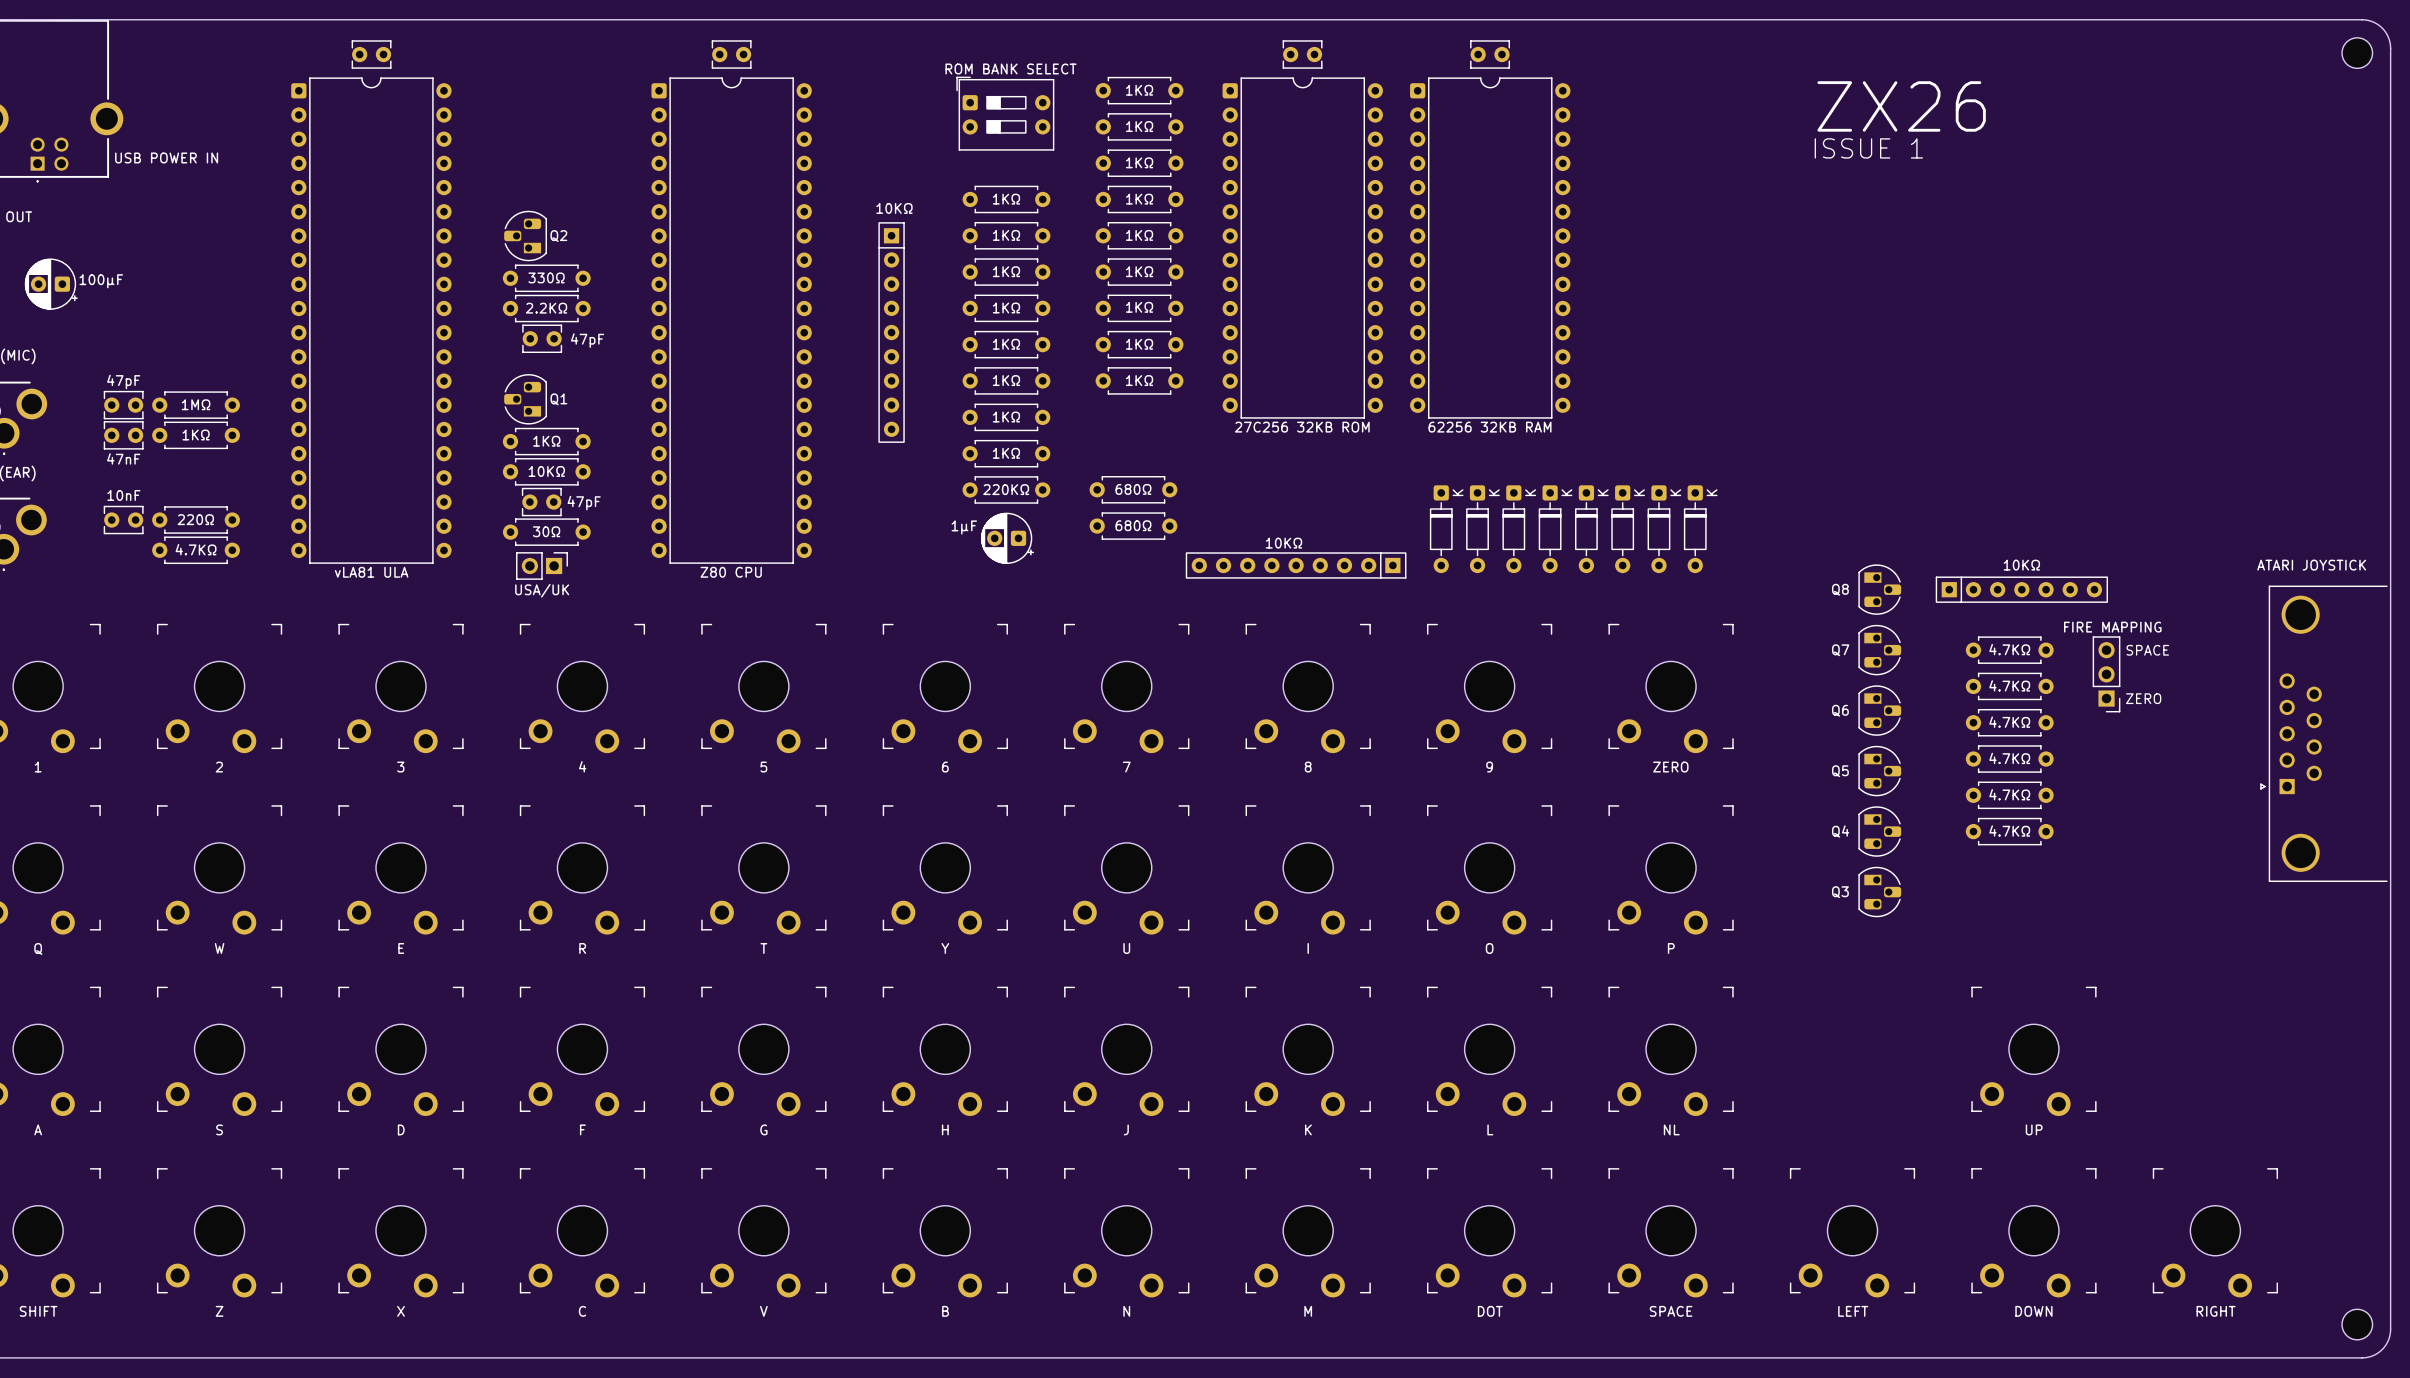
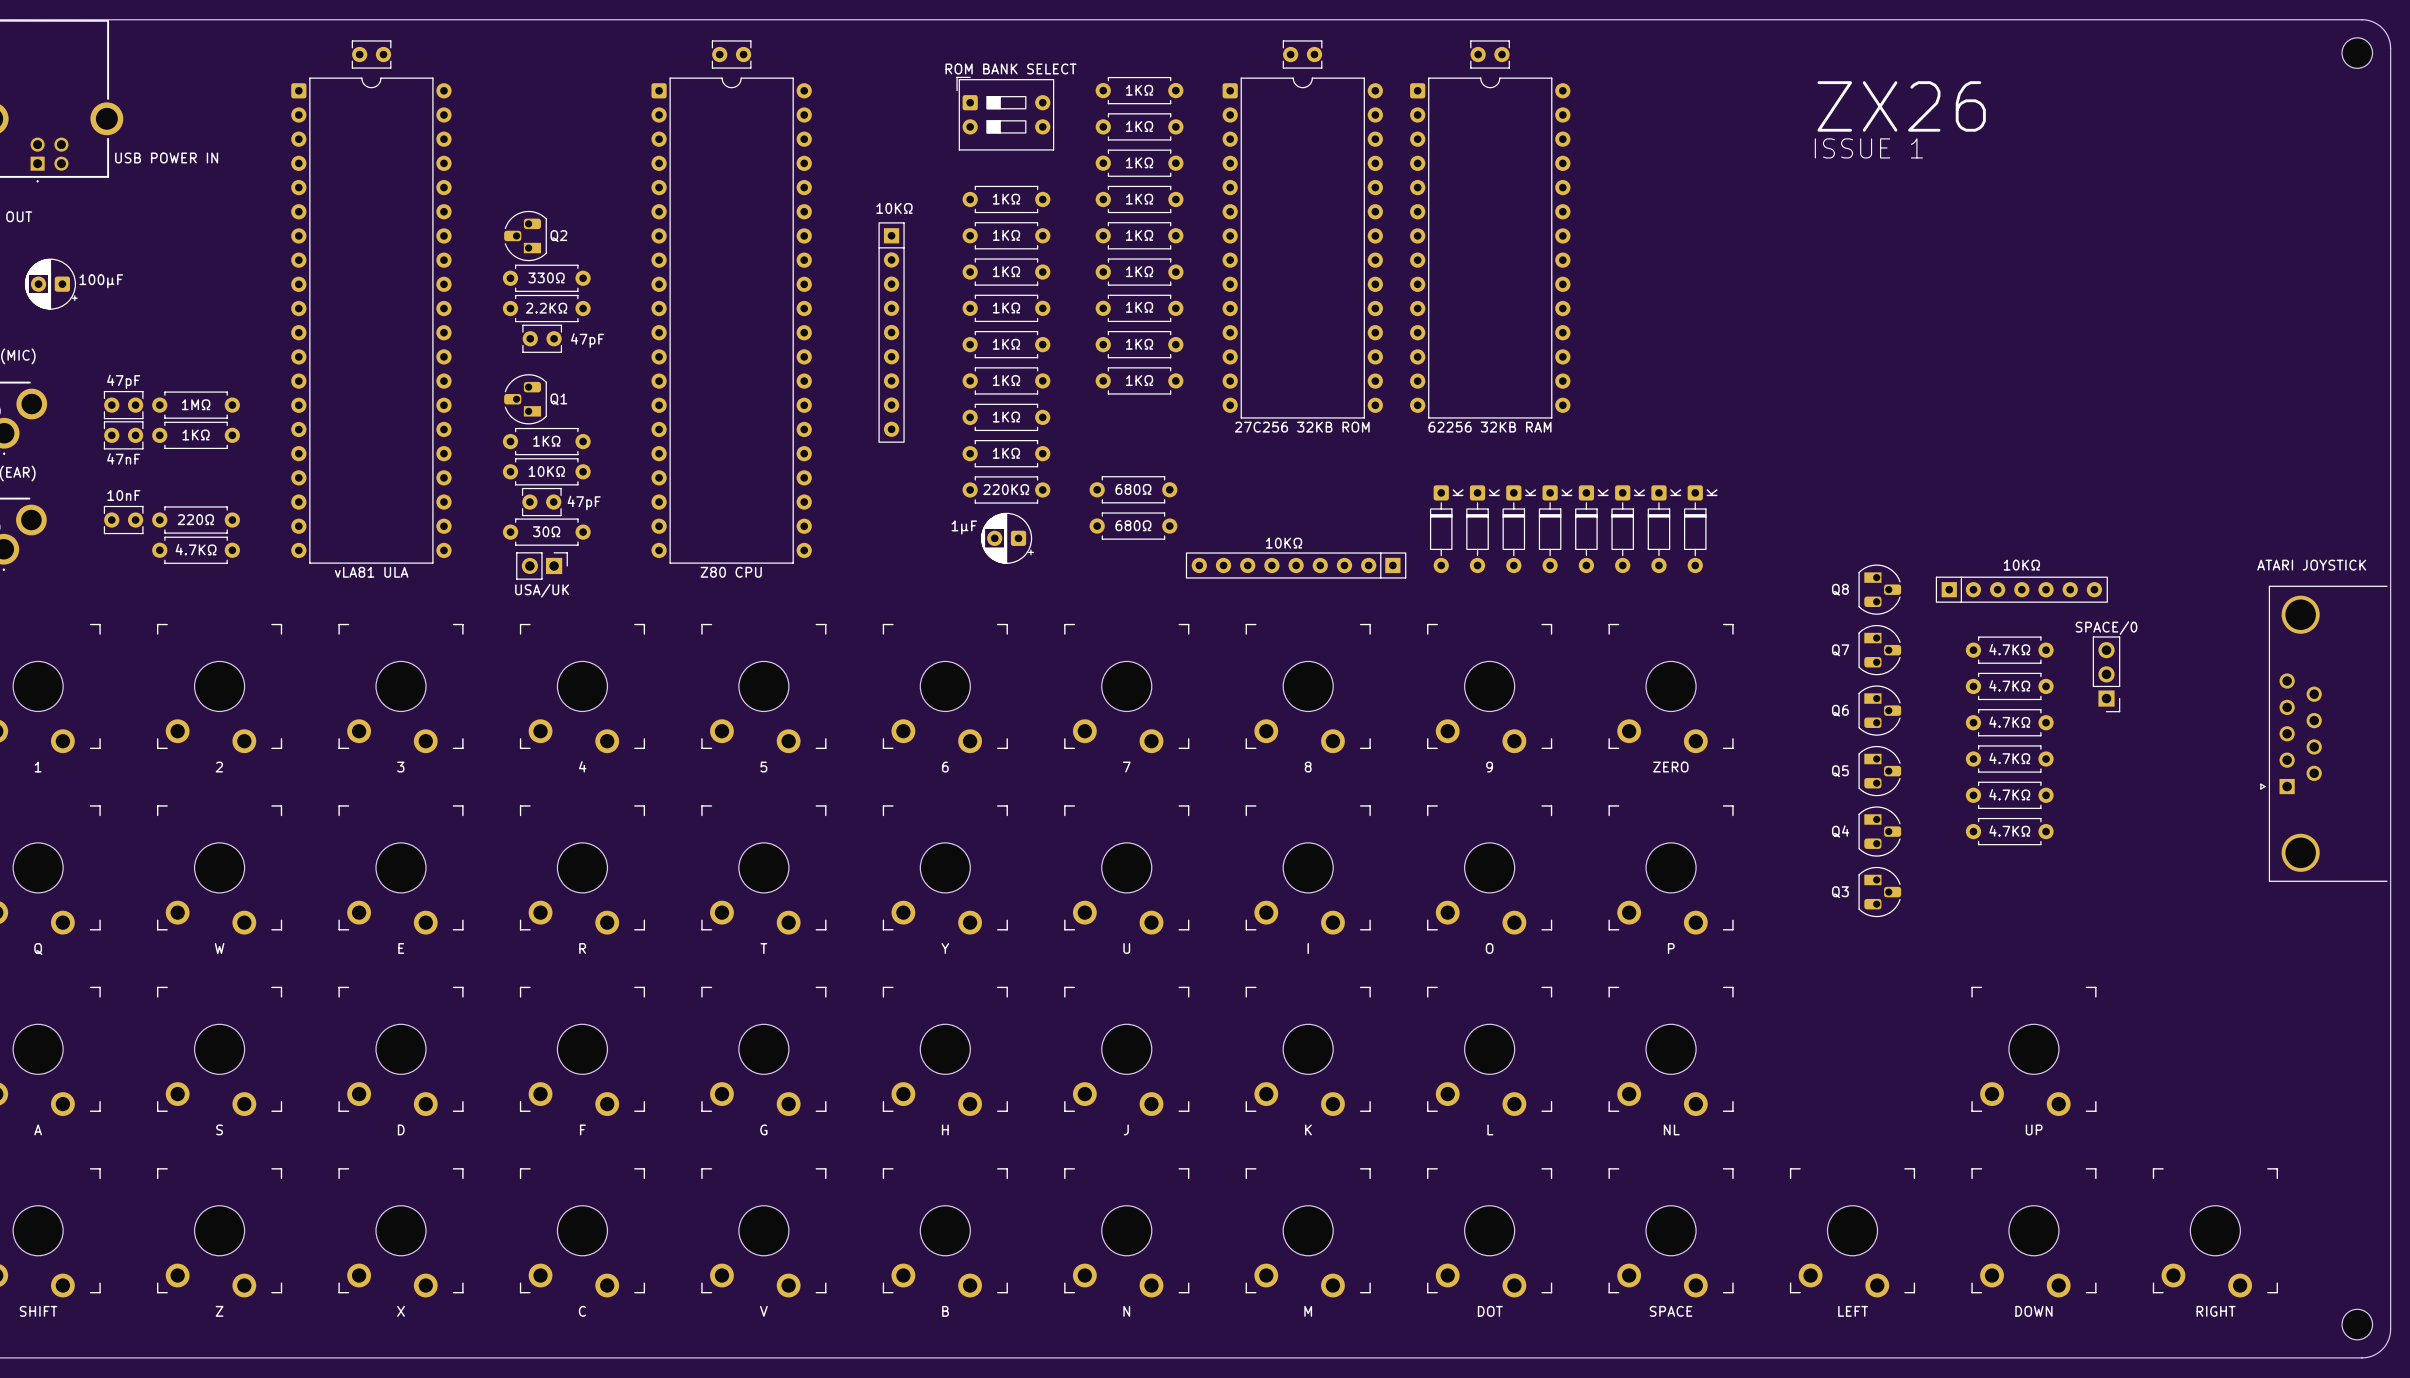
part value: FIRE MAPPING (2112, 627) -> SPACE/0 (2106, 628)
text: SPACE (2147, 650) -> none
text: ZERO (2143, 698) -> none

